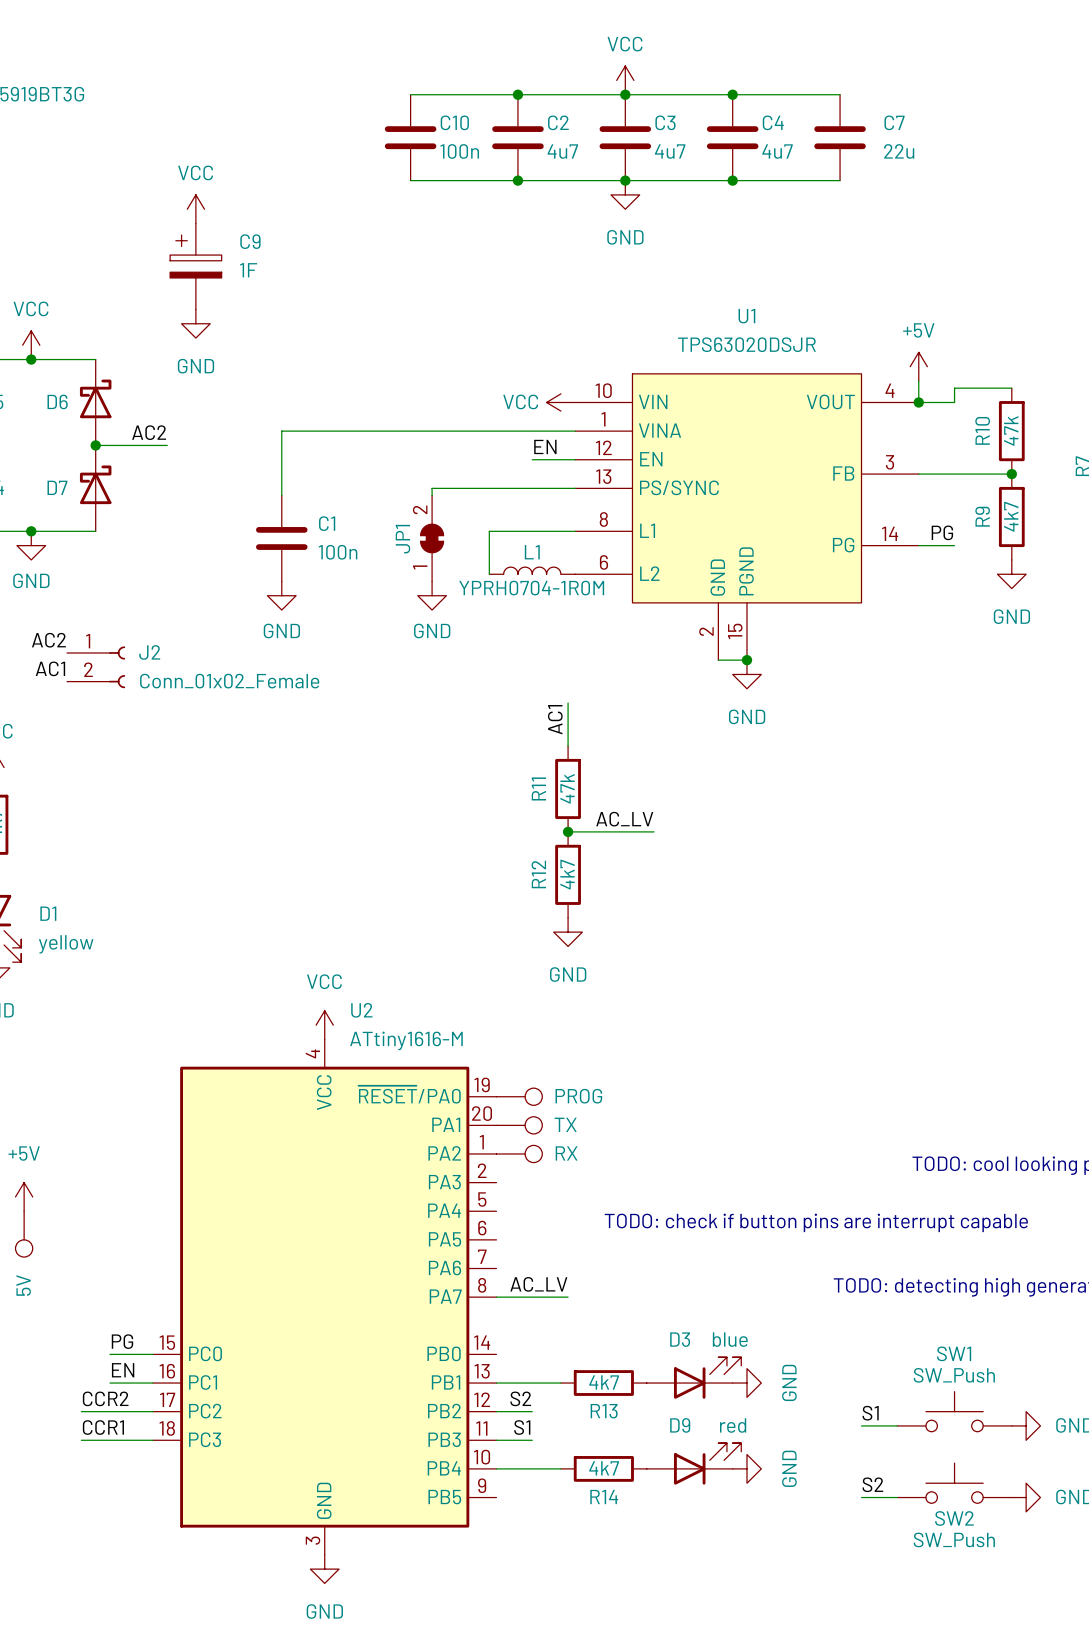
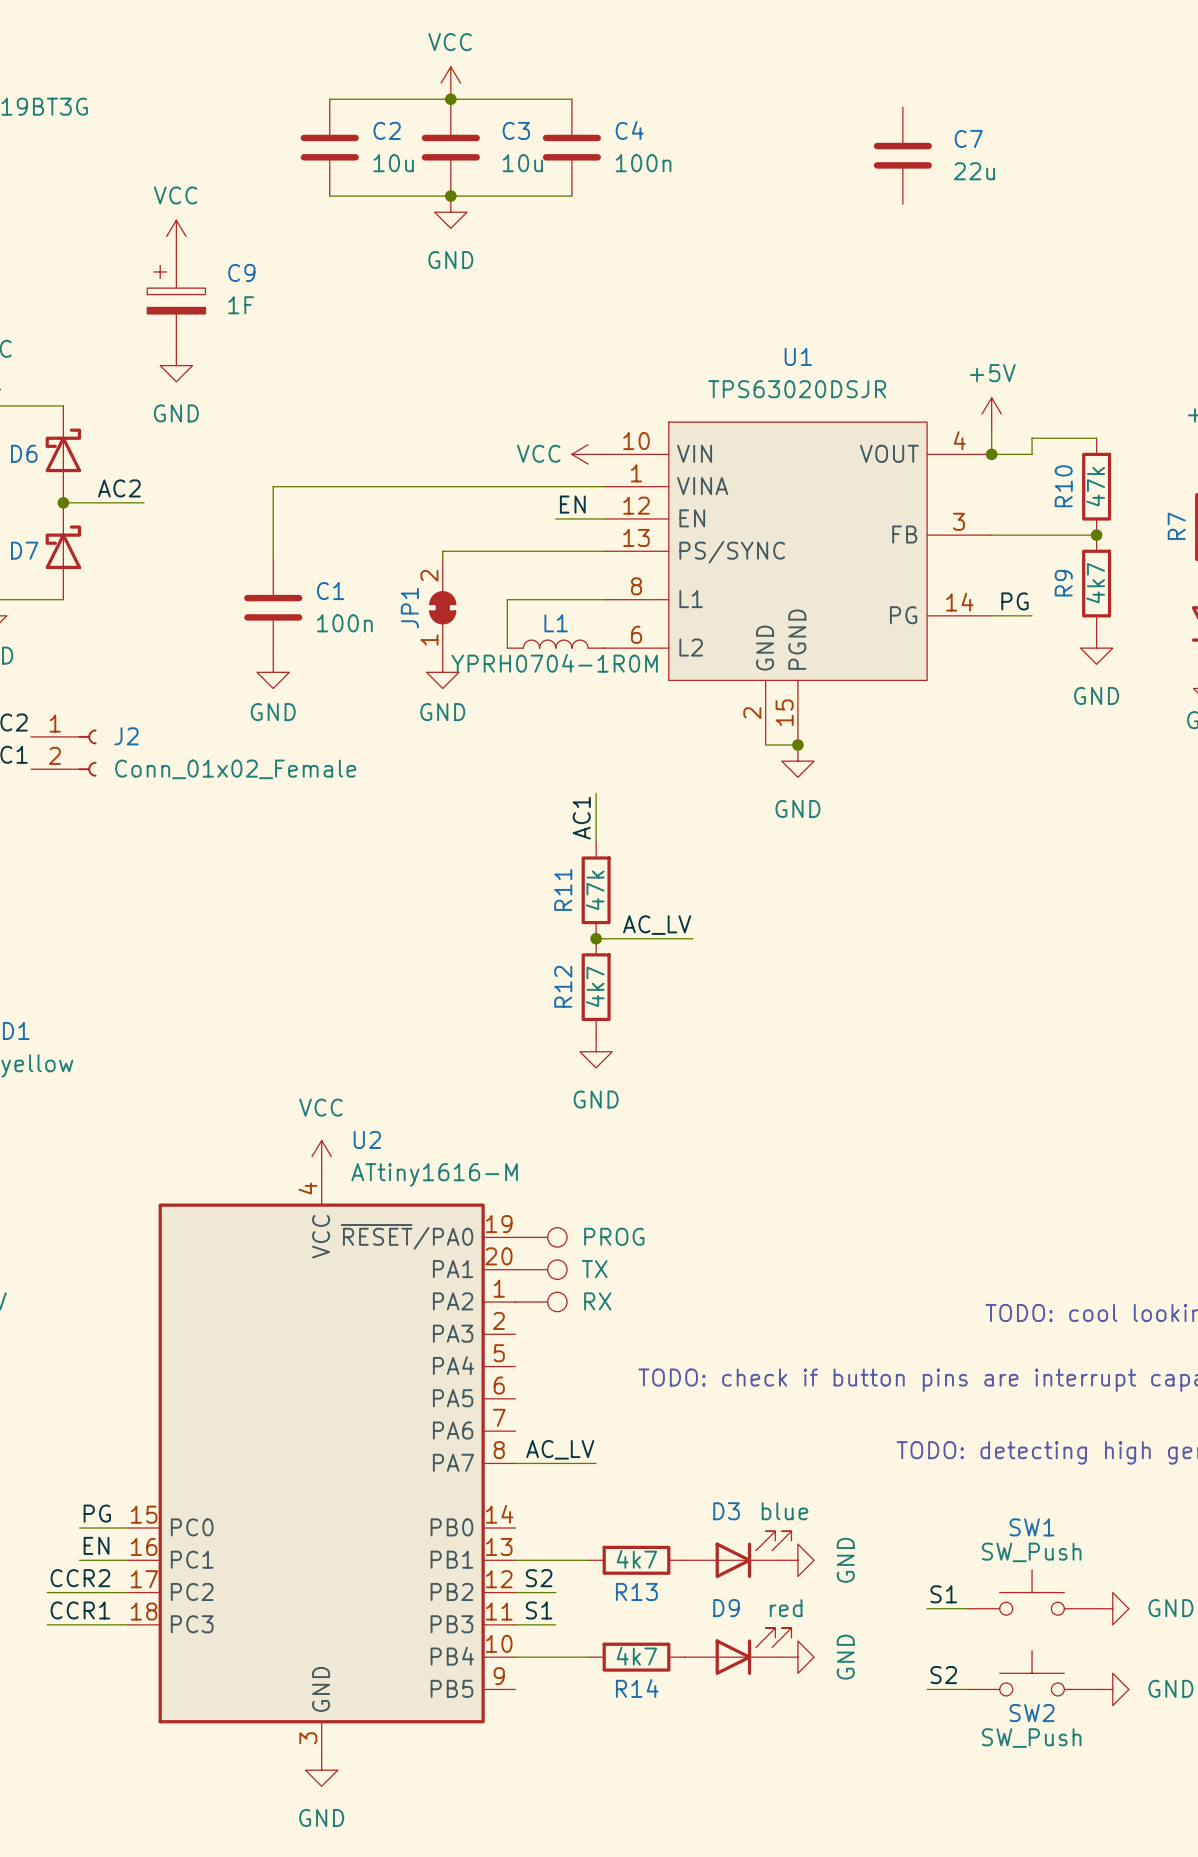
power symbol position: VCC (625, 80) -> VCC (450, 83)
wire: none -> (329, 99) (571, 99)
junction: none -> (450, 99)
wire: (410, 94) (840, 94) -> none
junction: (517, 94) -> none
junction: (625, 94) -> none
junction: (732, 94) -> none
C2 name position: C2 (558, 122) -> C2 (387, 130)
C3 name position: C3 (665, 122) -> C3 (516, 130)
C4 name position: C4 (773, 122) -> C4 (629, 130)
C10: 100n (410, 137) -> none
C2 position: (517, 137) -> (329, 147)
C3 position: (625, 137) -> (450, 147)
C4 position: (732, 137) -> (571, 147)
C2 value: 4u7 (562, 151) -> 10u (393, 163)
C3 value: 4u7 (670, 151) -> 10u (522, 163)
C4 value: 4u7 (777, 151) -> 100n (643, 163)
wire: none -> (329, 196) (571, 196)
junction: none -> (450, 196)
wire: (410, 180) (840, 180) -> none
junction: (517, 180) -> none
junction: (625, 180) -> none
junction: (732, 180) -> none
power symbol position: GND (625, 194) -> GND (450, 212)

